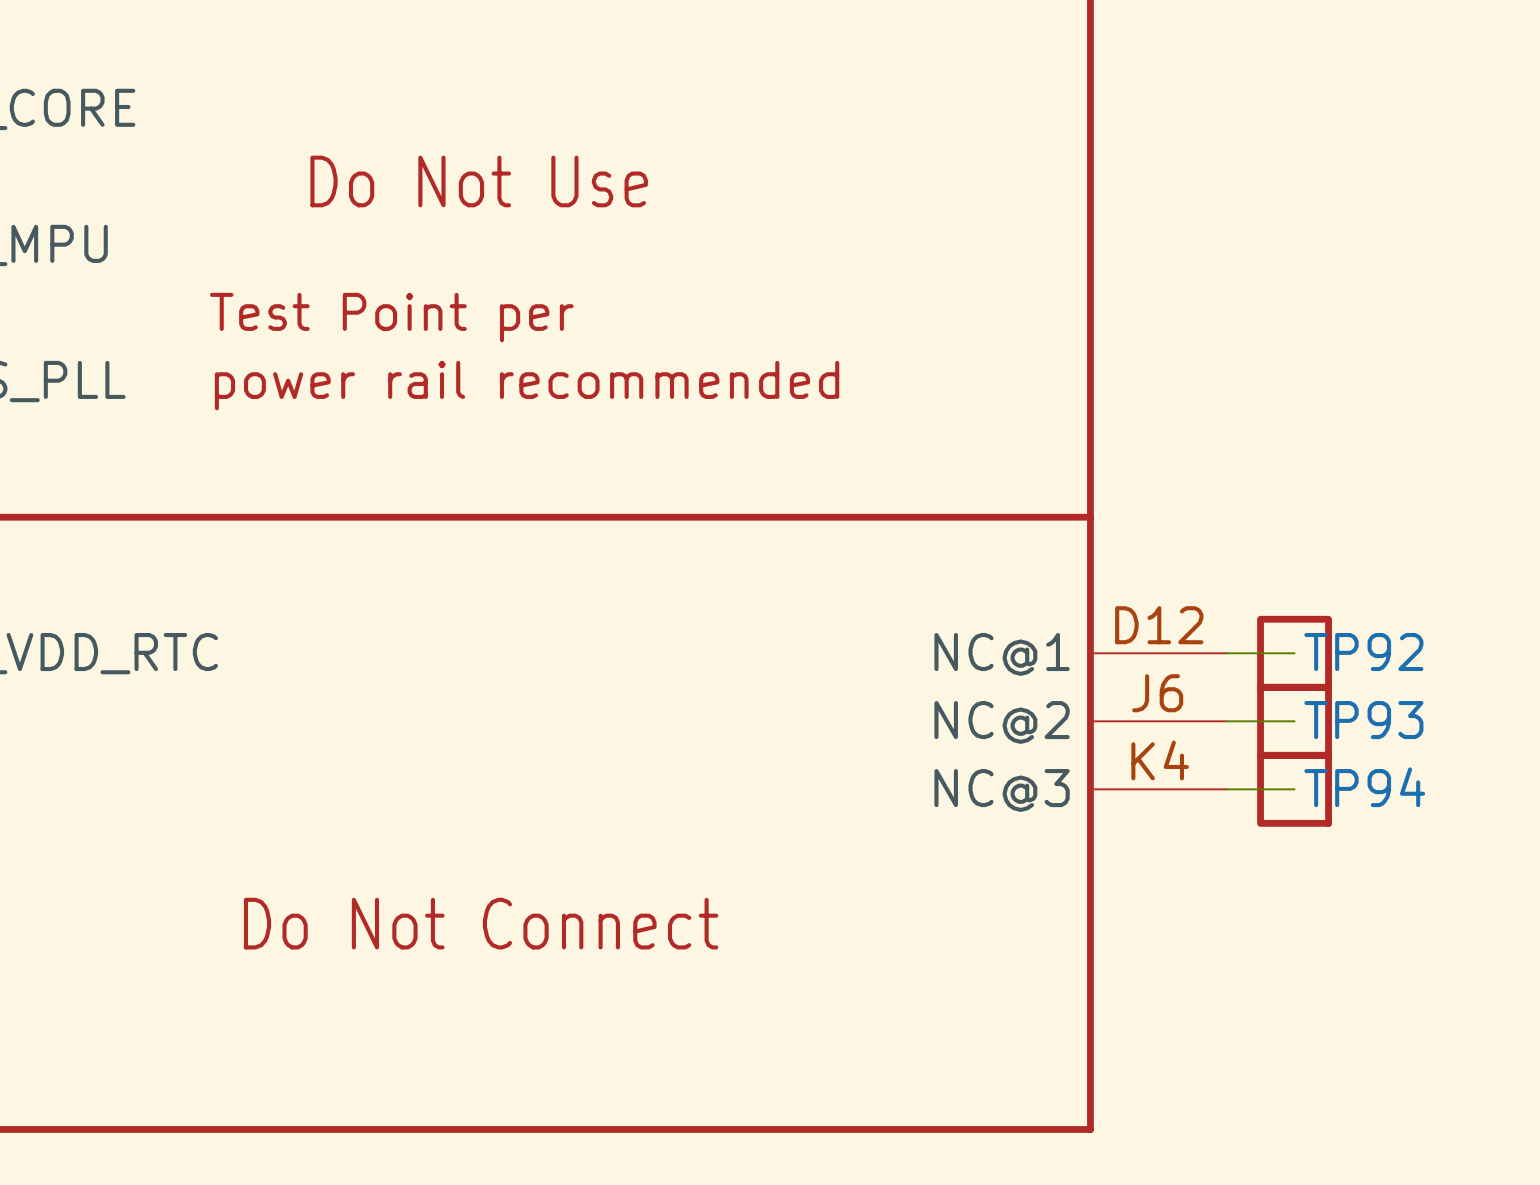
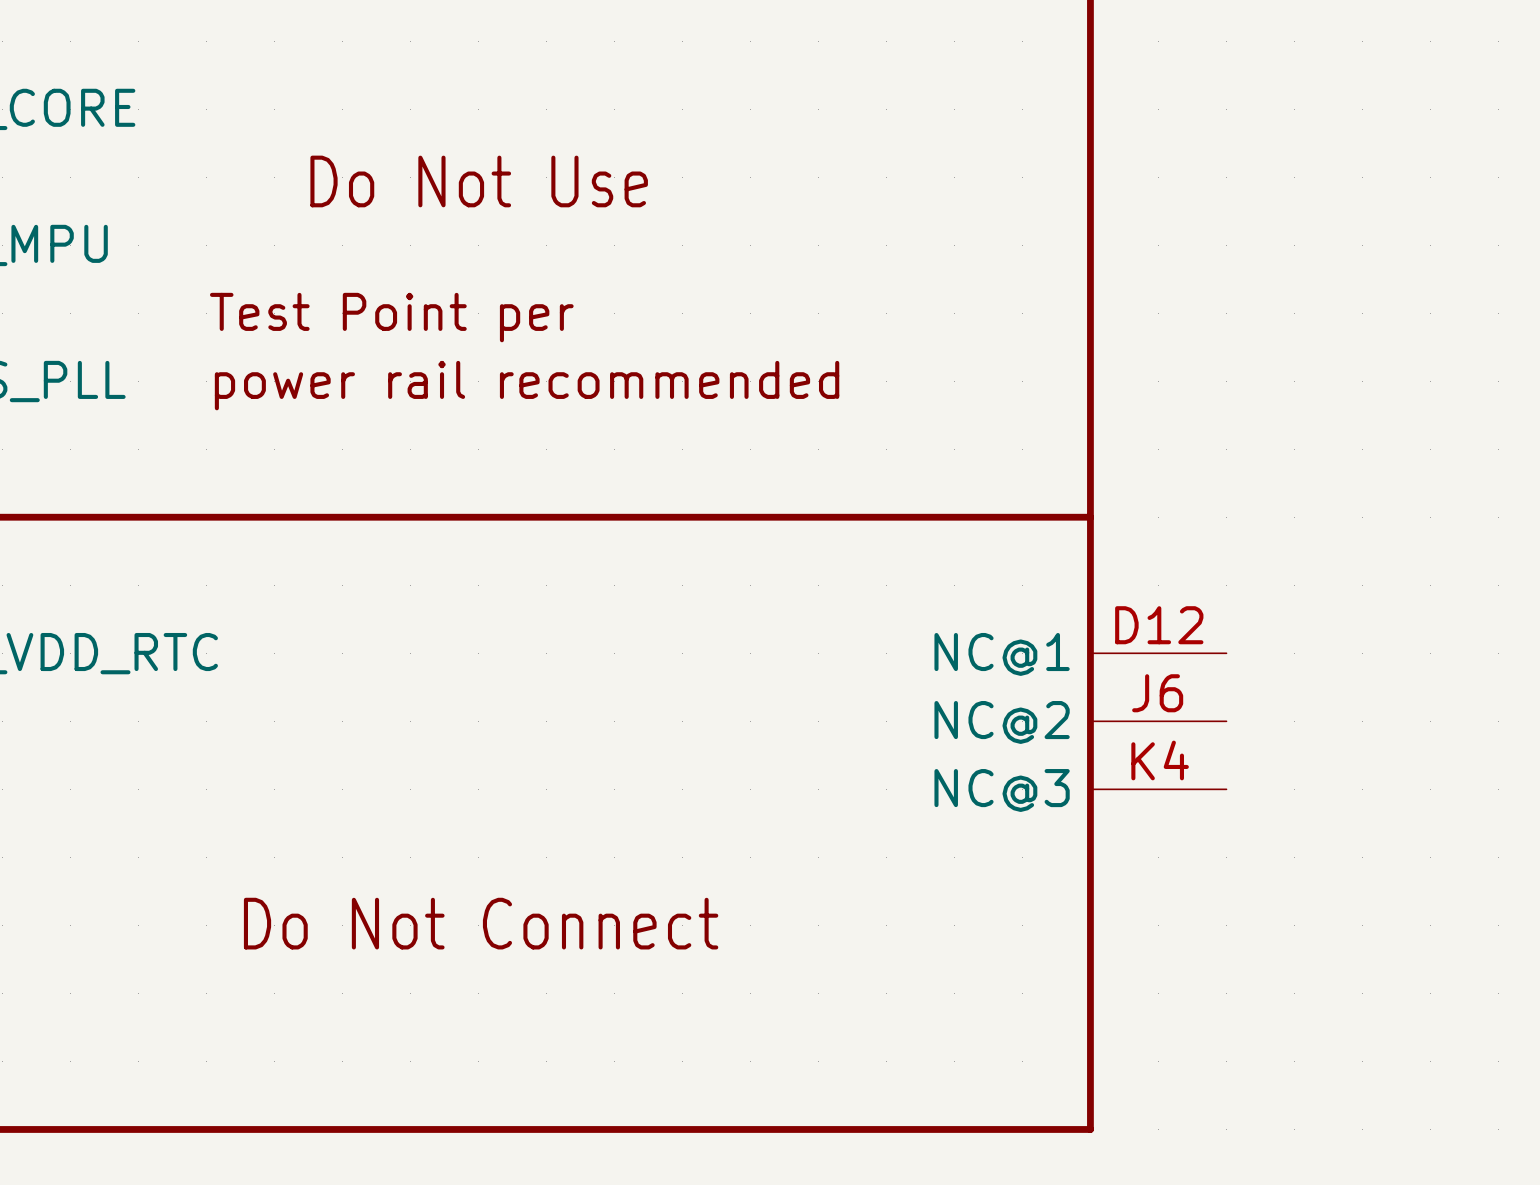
wire: (1226, 653) (1294, 653) -> none
TP92: (1294, 653) -> none
wire: (1226, 721) (1294, 721) -> none
TP93: (1294, 721) -> none
wire: (1226, 789) (1294, 789) -> none
TP94: (1294, 789) -> none

